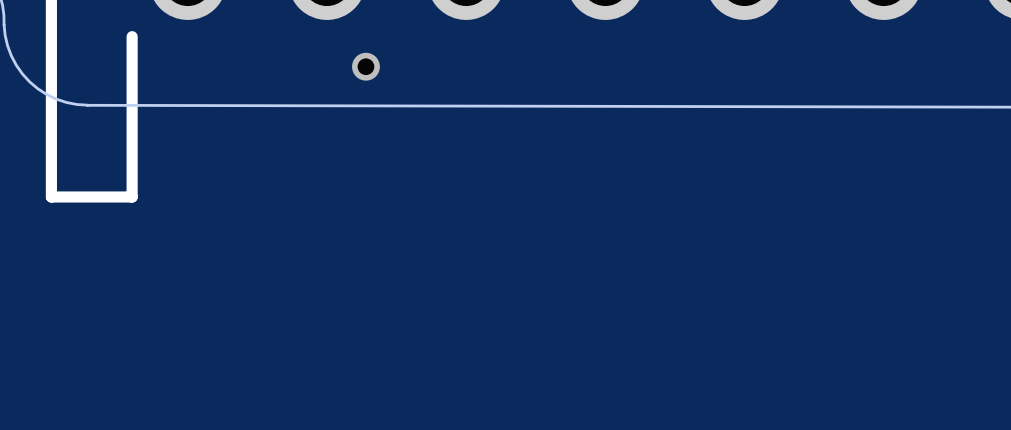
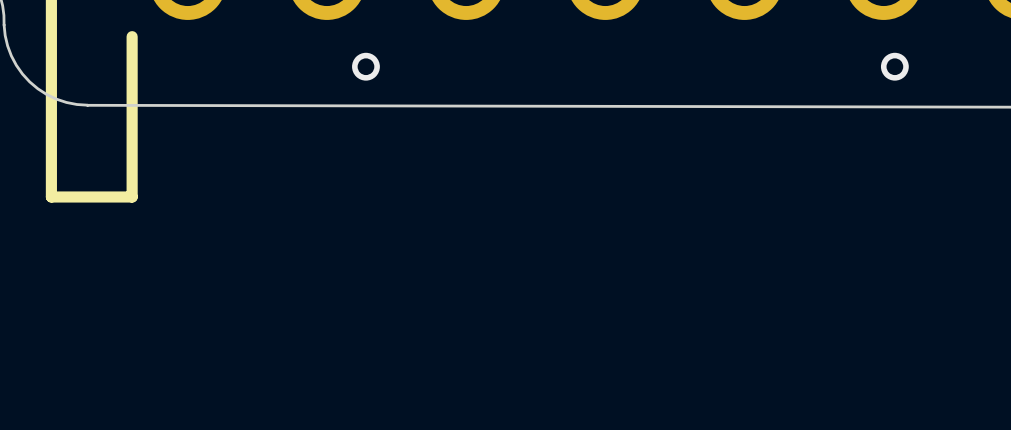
via: none -> (894, 66)

